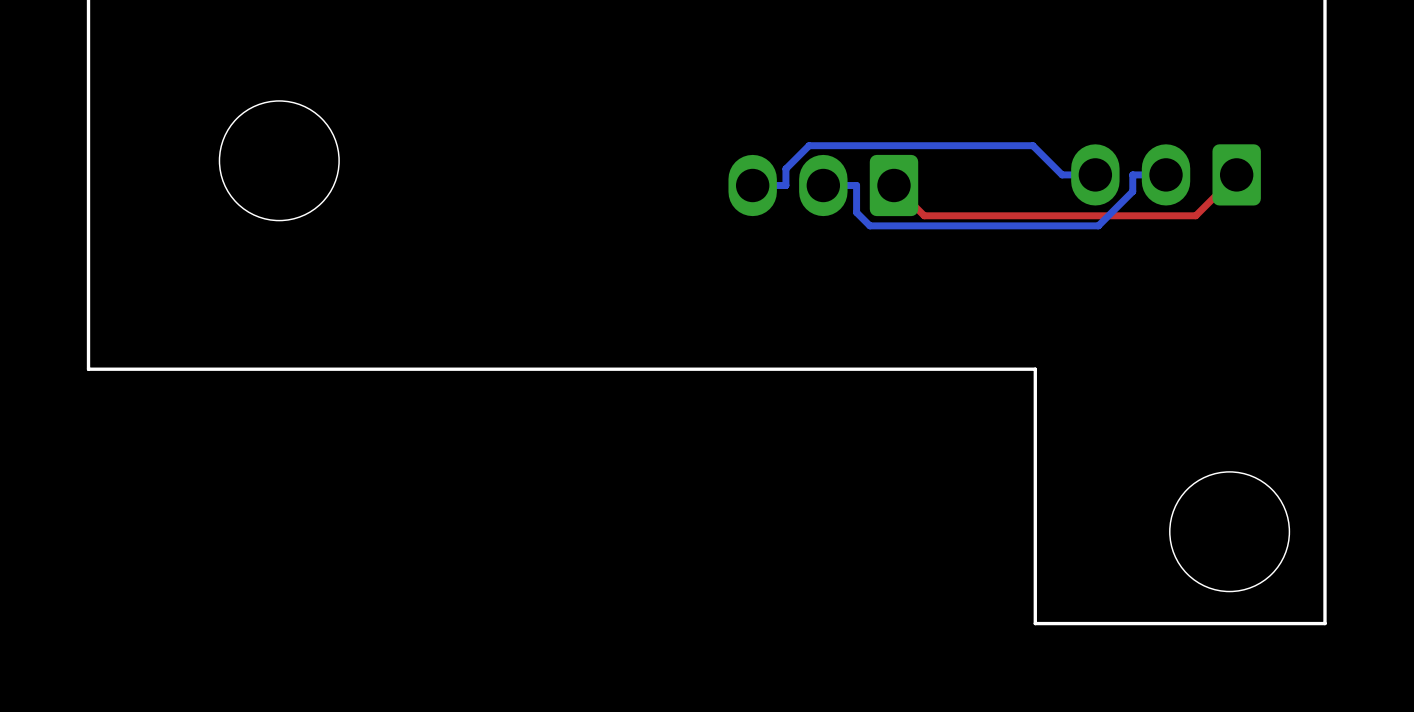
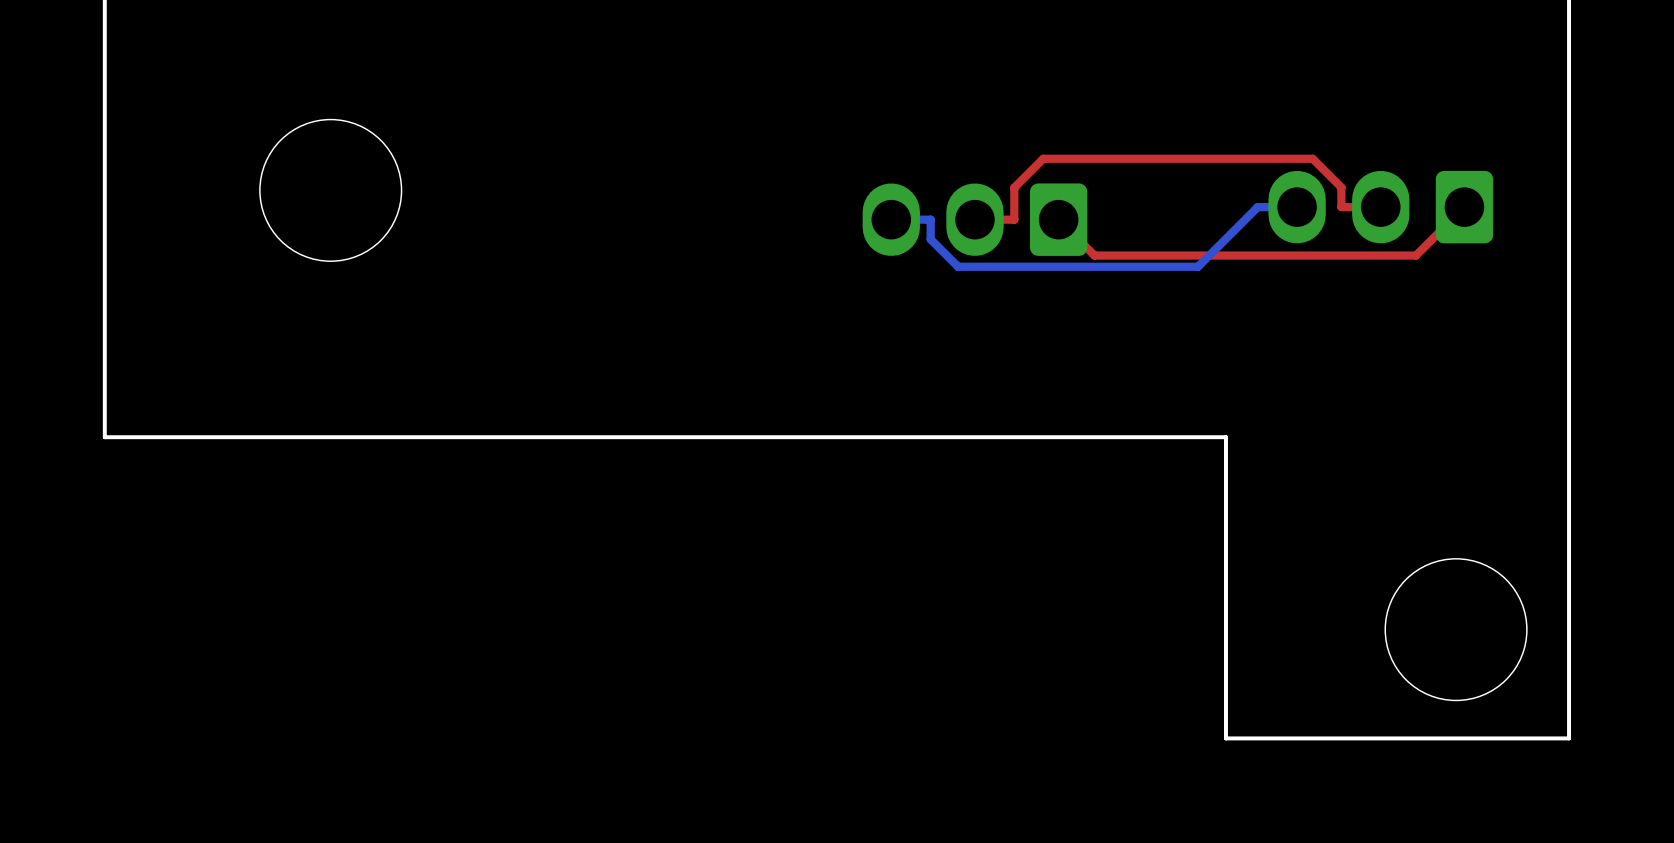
bottom track: (1062, 174) (1032, 145) (809, 145) (785, 168) (785, 185) -> (1257, 207) (1198, 266) (958, 266) (930, 239) (930, 219)
bottom track: (1166, 174) (1132, 174) (1132, 191) (1098, 225) (869, 225) (856, 212) (856, 185) (823, 185) -> none
top track: none -> (1380, 207) (1341, 207) (1341, 187) (1312, 158) (1043, 158) (1014, 187) (1014, 219) (974, 219)

